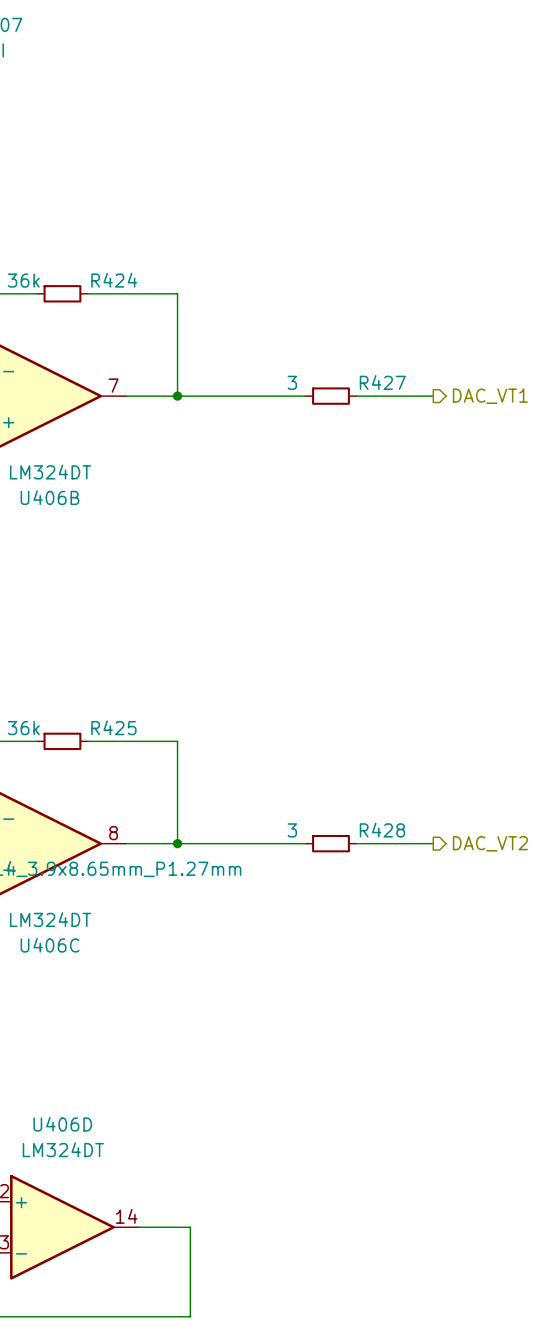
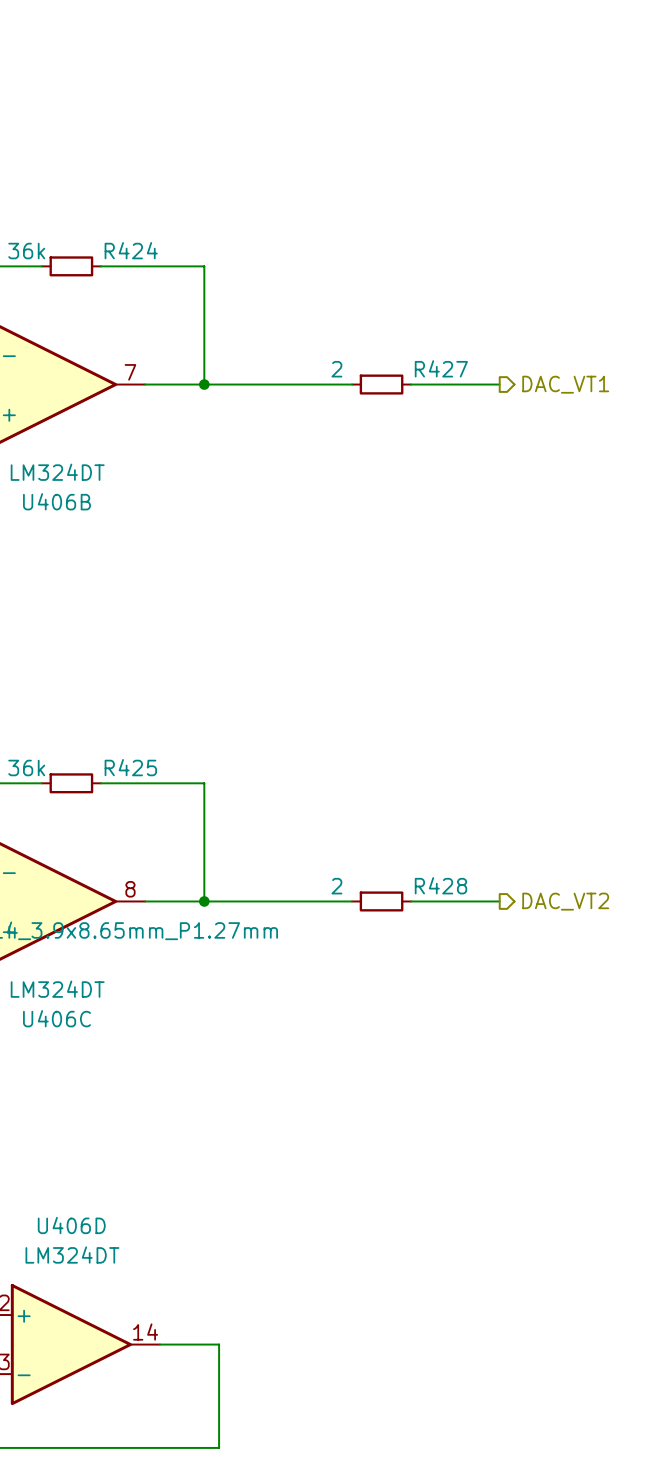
R427 value: 3 (292, 382) -> 2 (336, 369)
R428 value: 3 (292, 830) -> 2 (336, 886)

